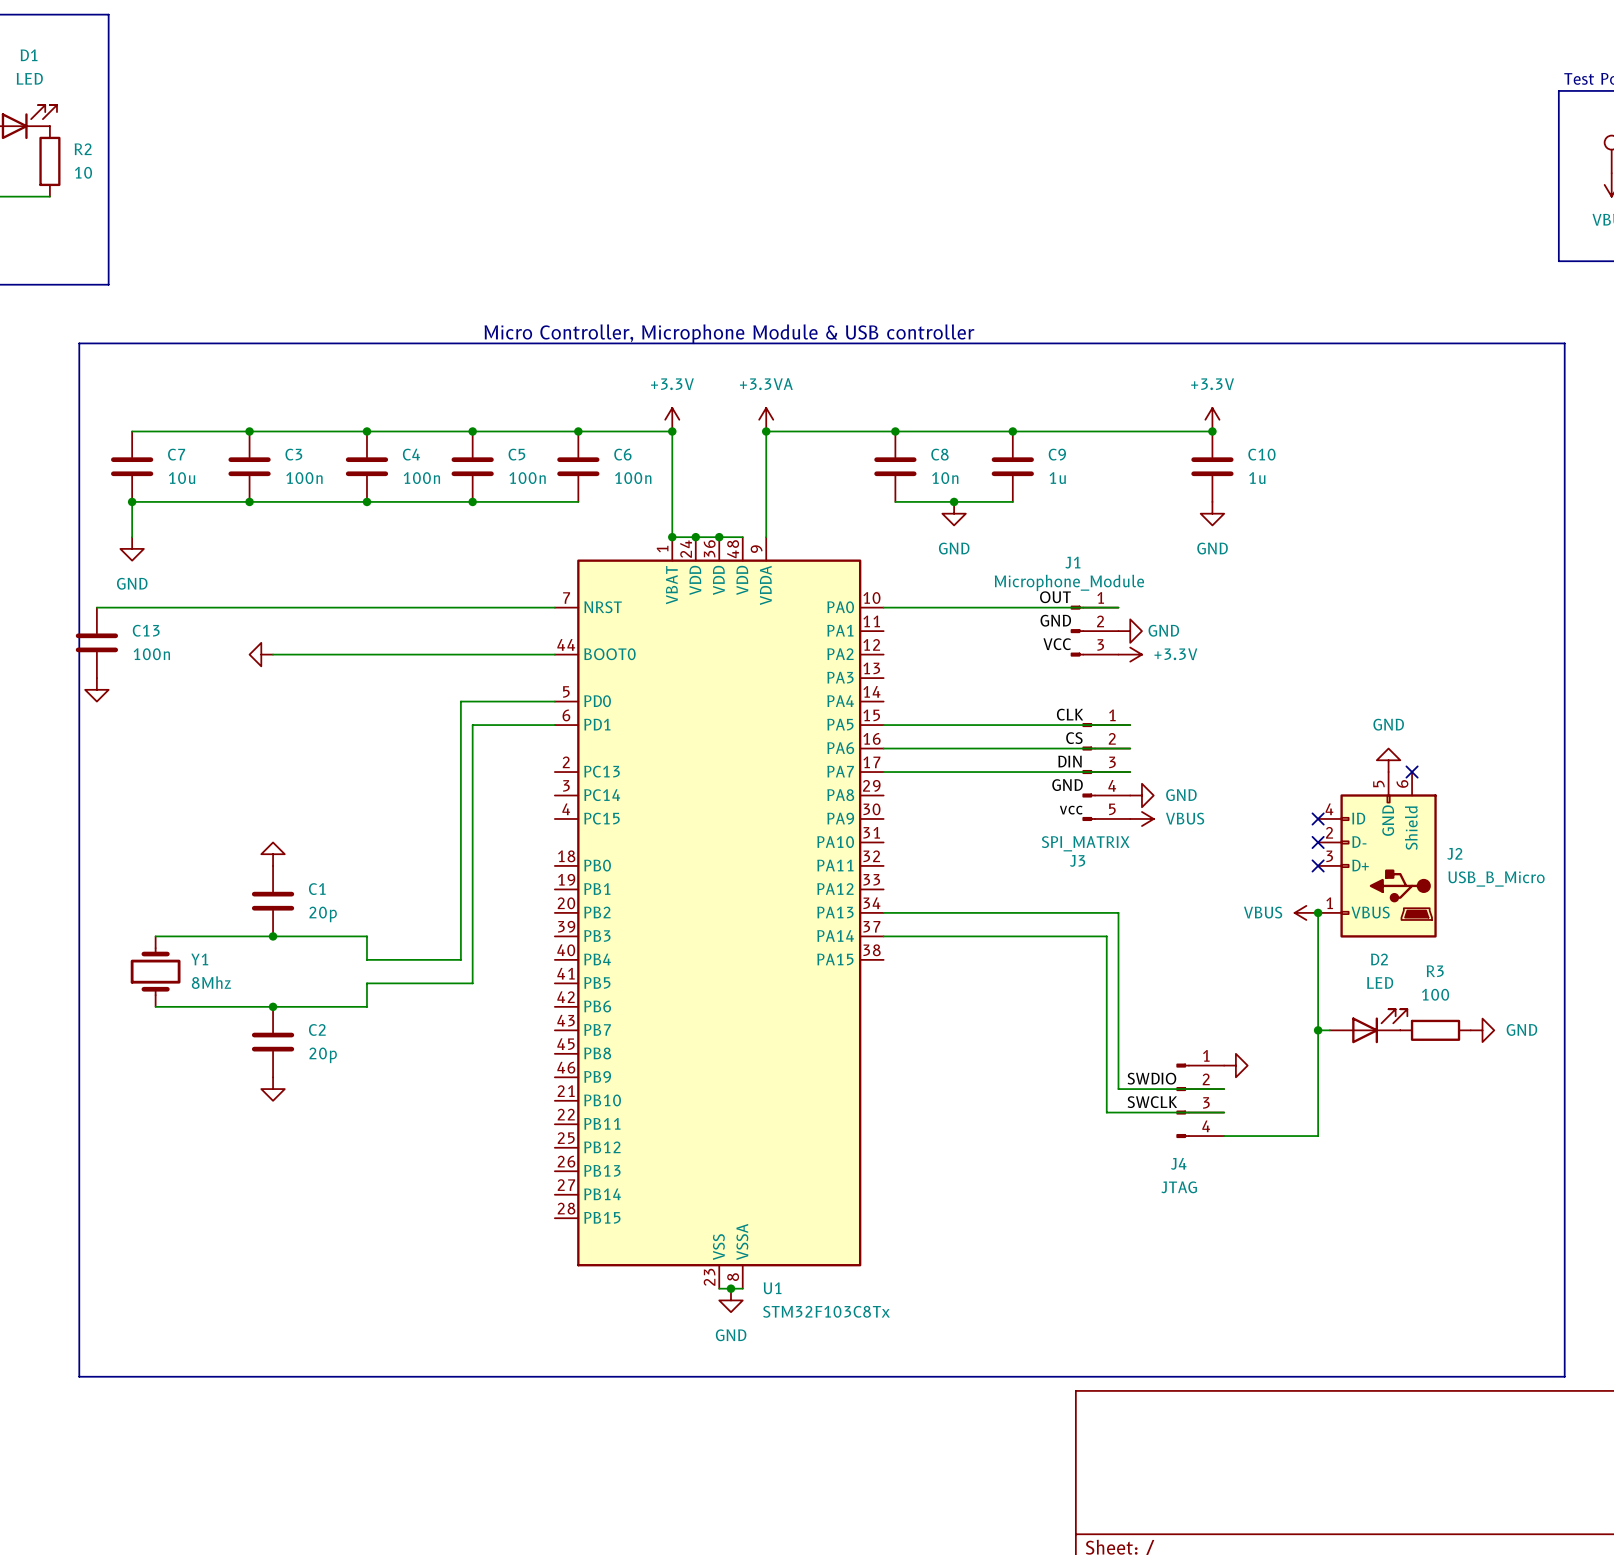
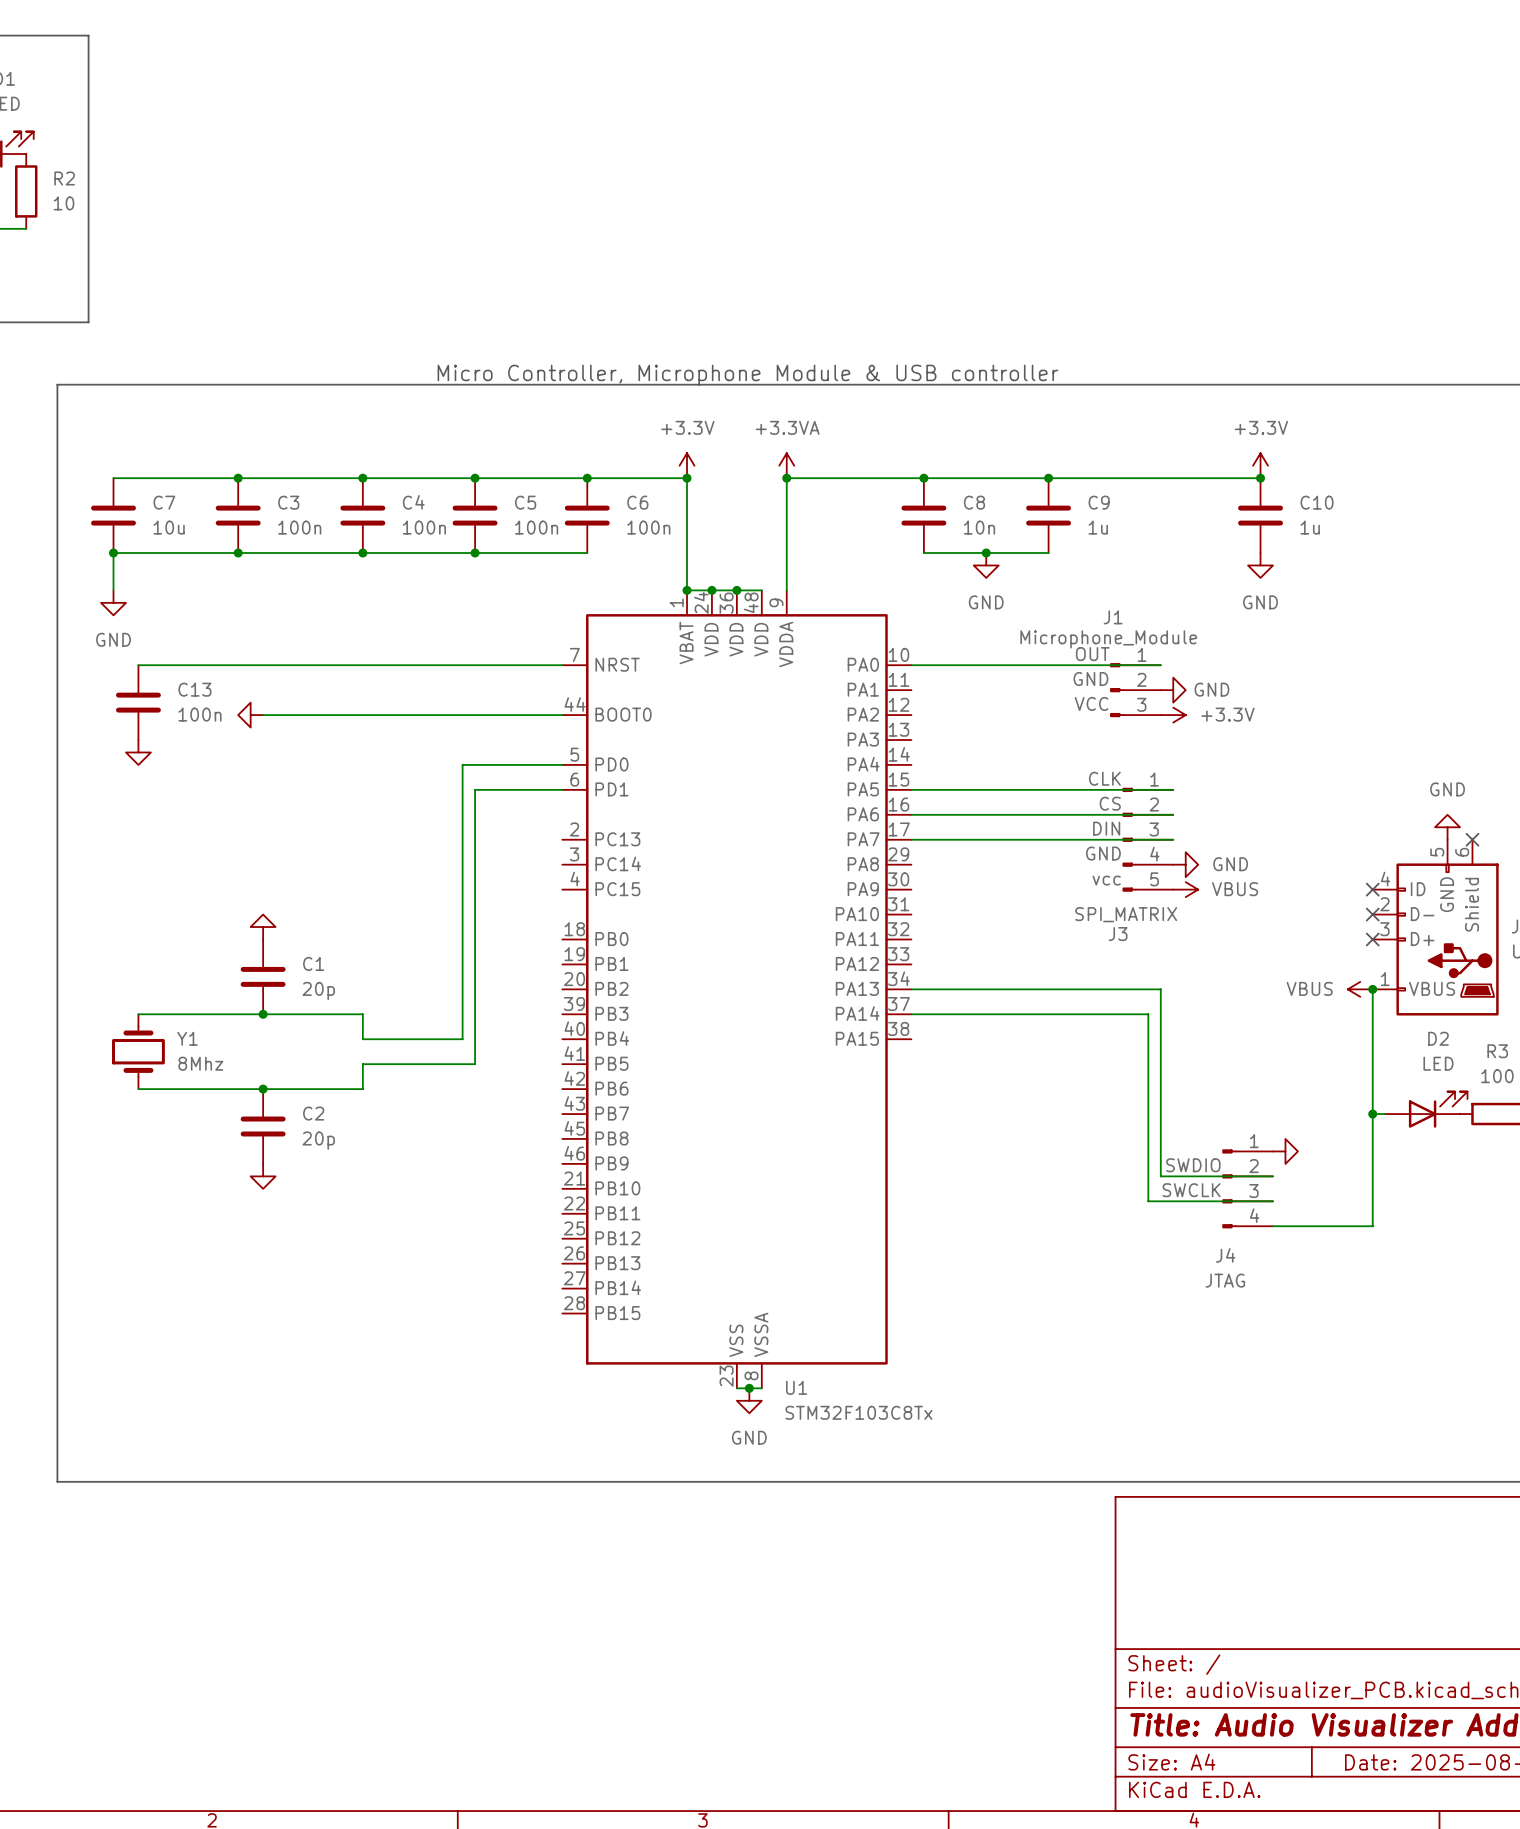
wire: (96, 607) (155, 607) -> none
C13 position: (96, 642) -> (138, 702)
power symbol position: (96, 689) -> (138, 752)

